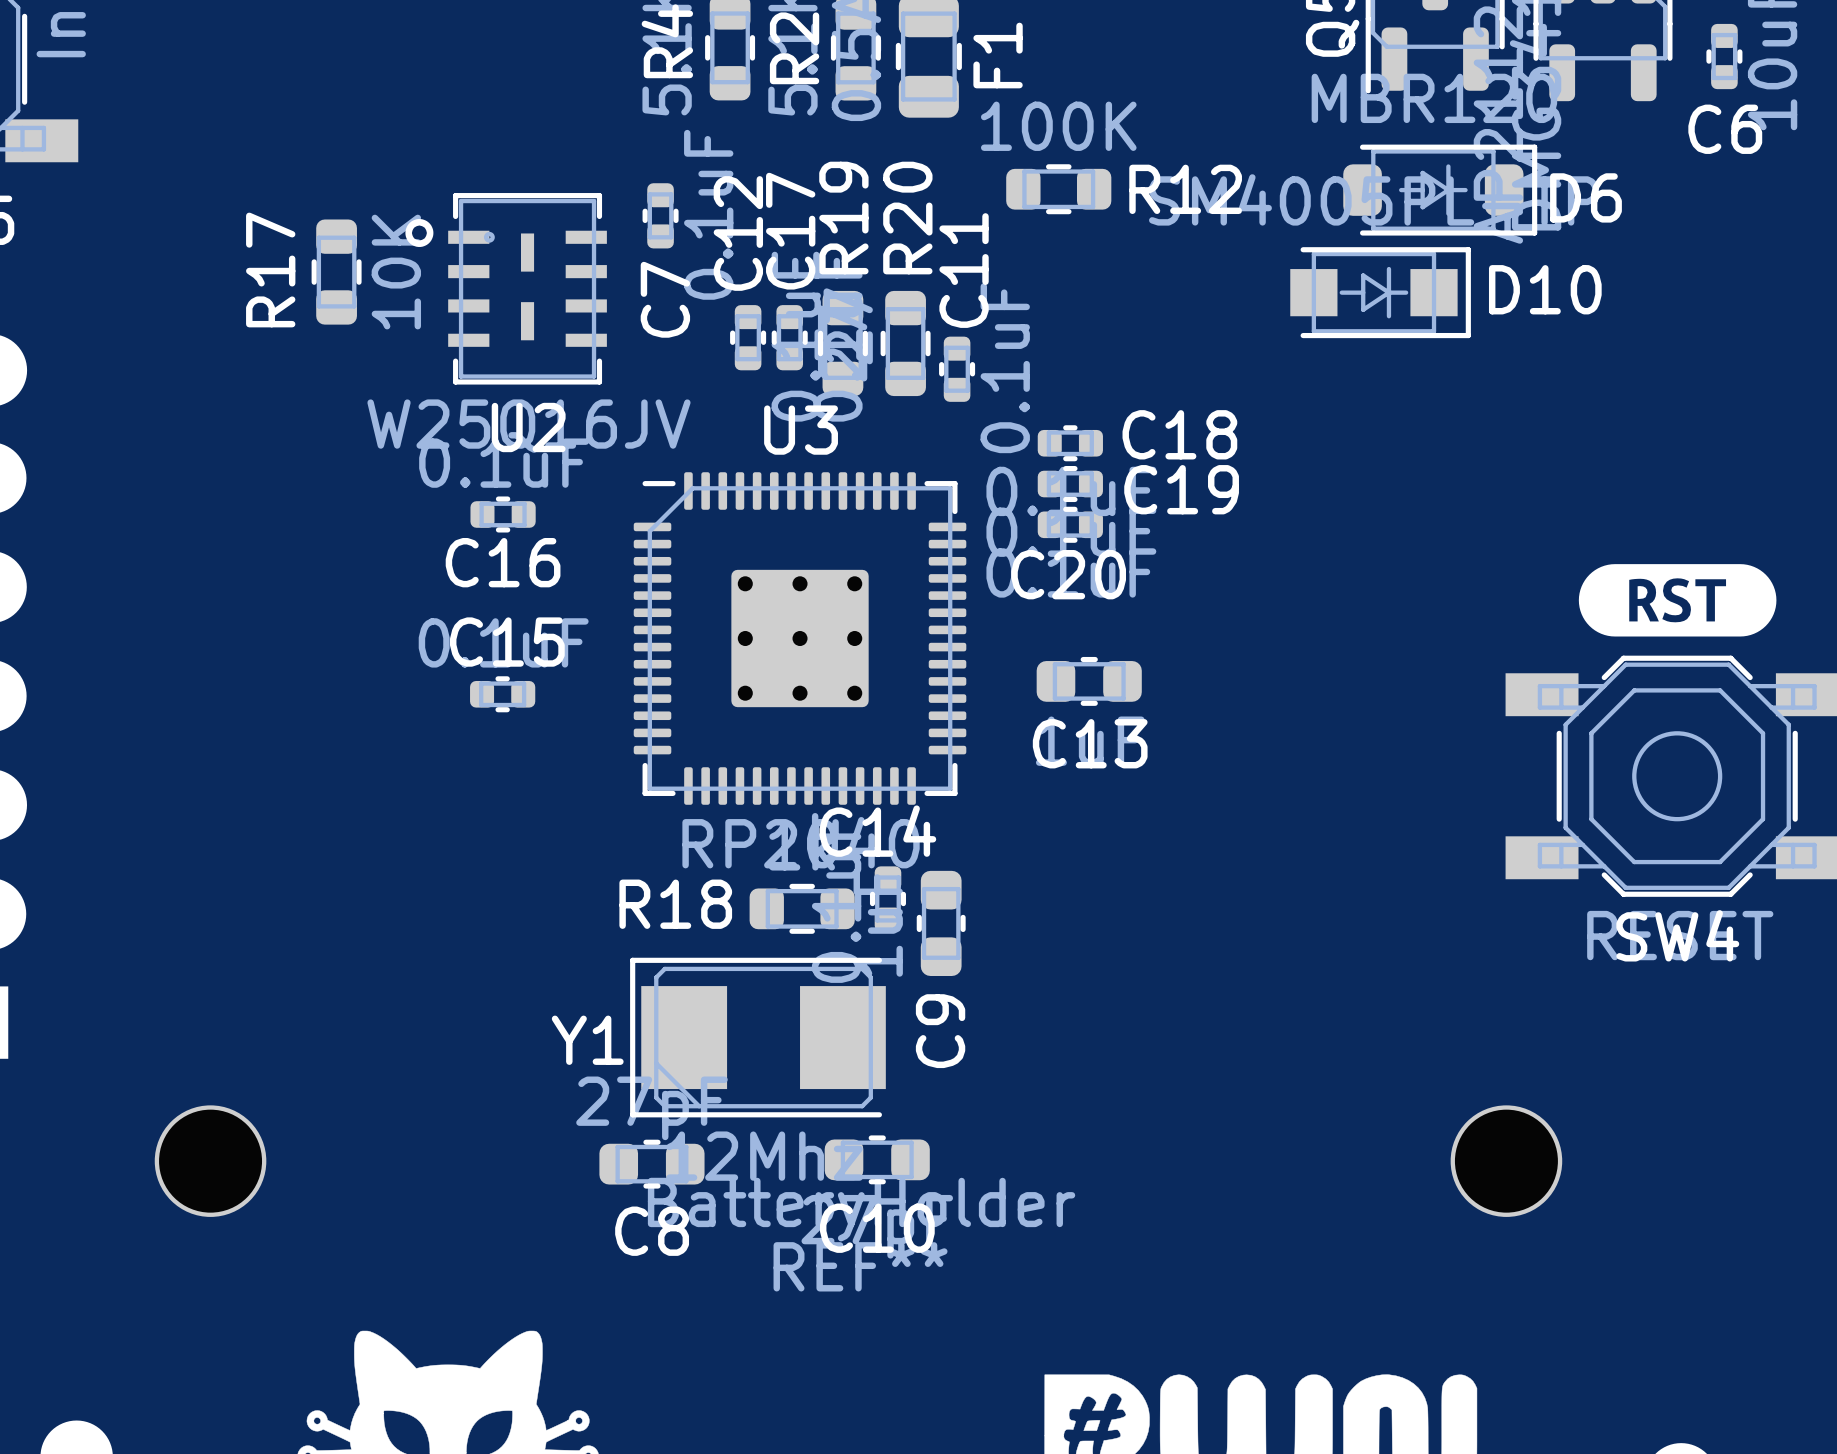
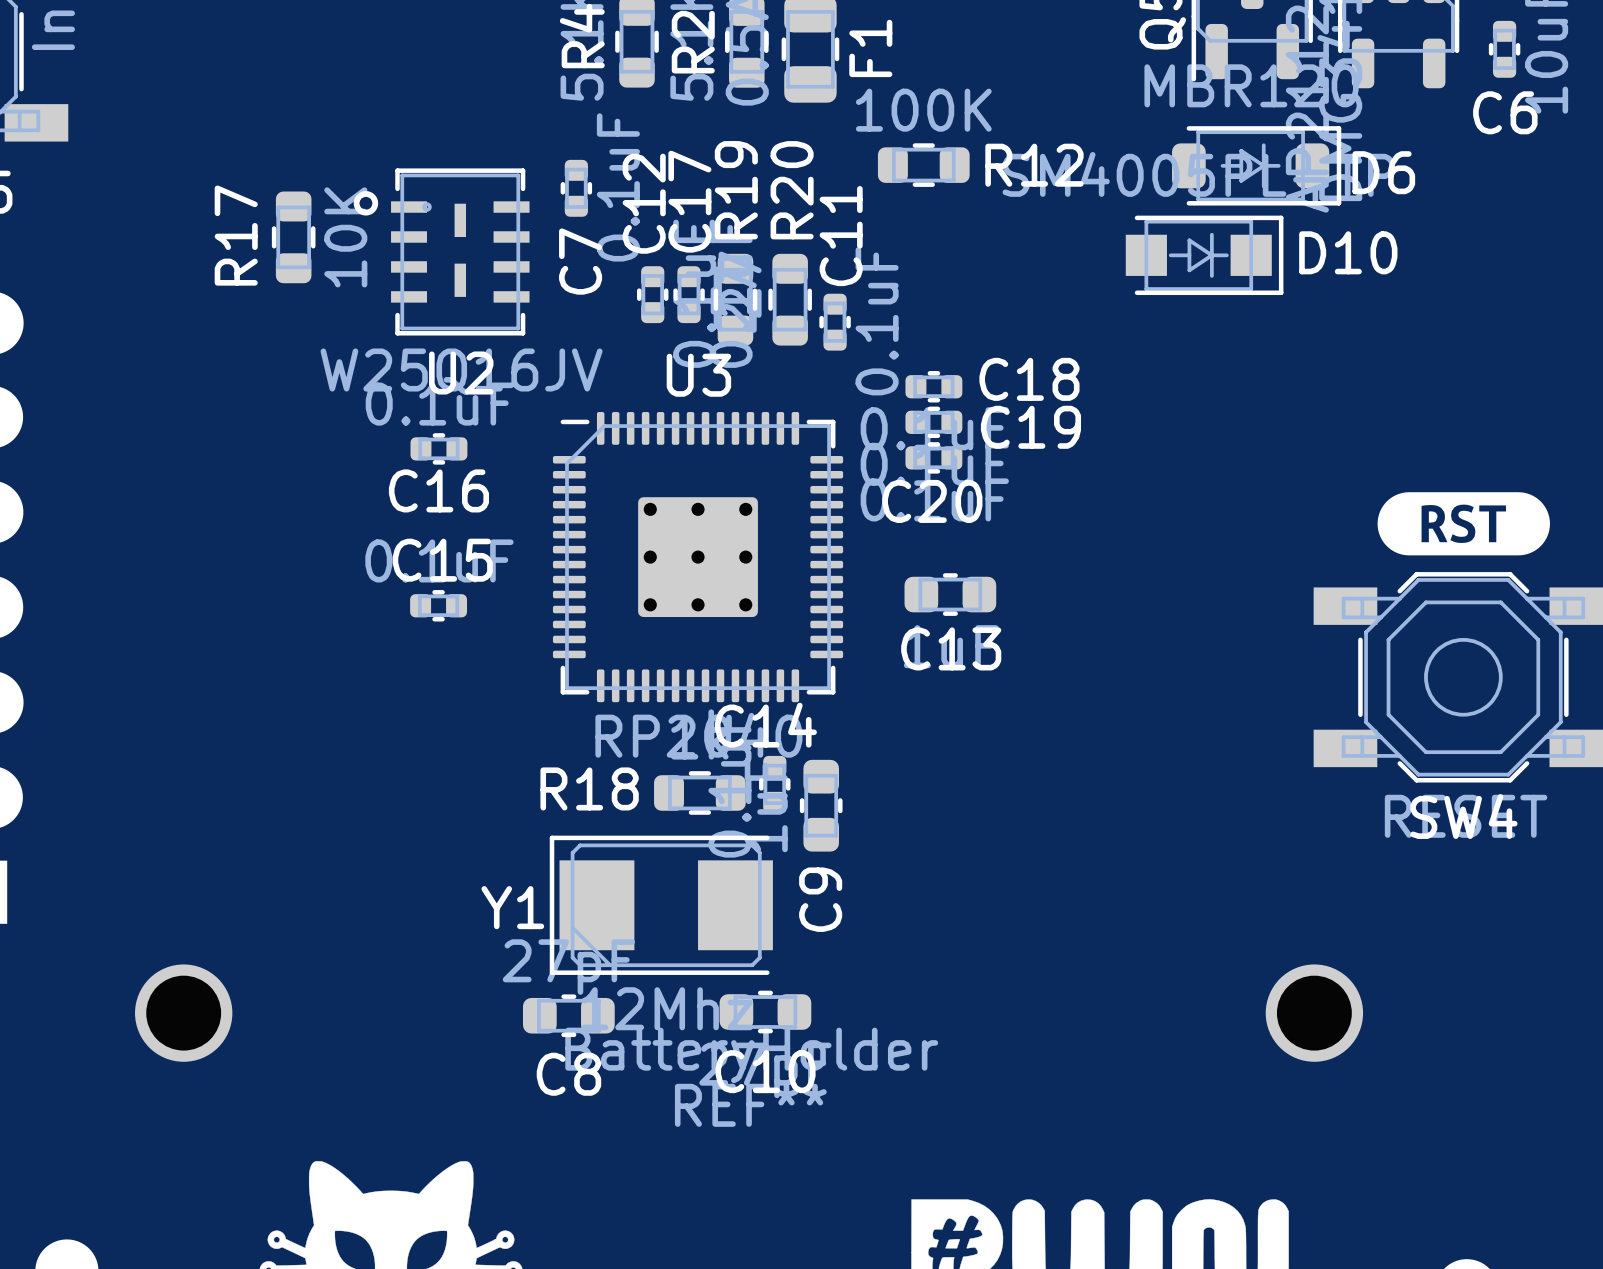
REF** footprint: [154, 1105, 1563, 1217] -> [135, 964, 1364, 1062]

